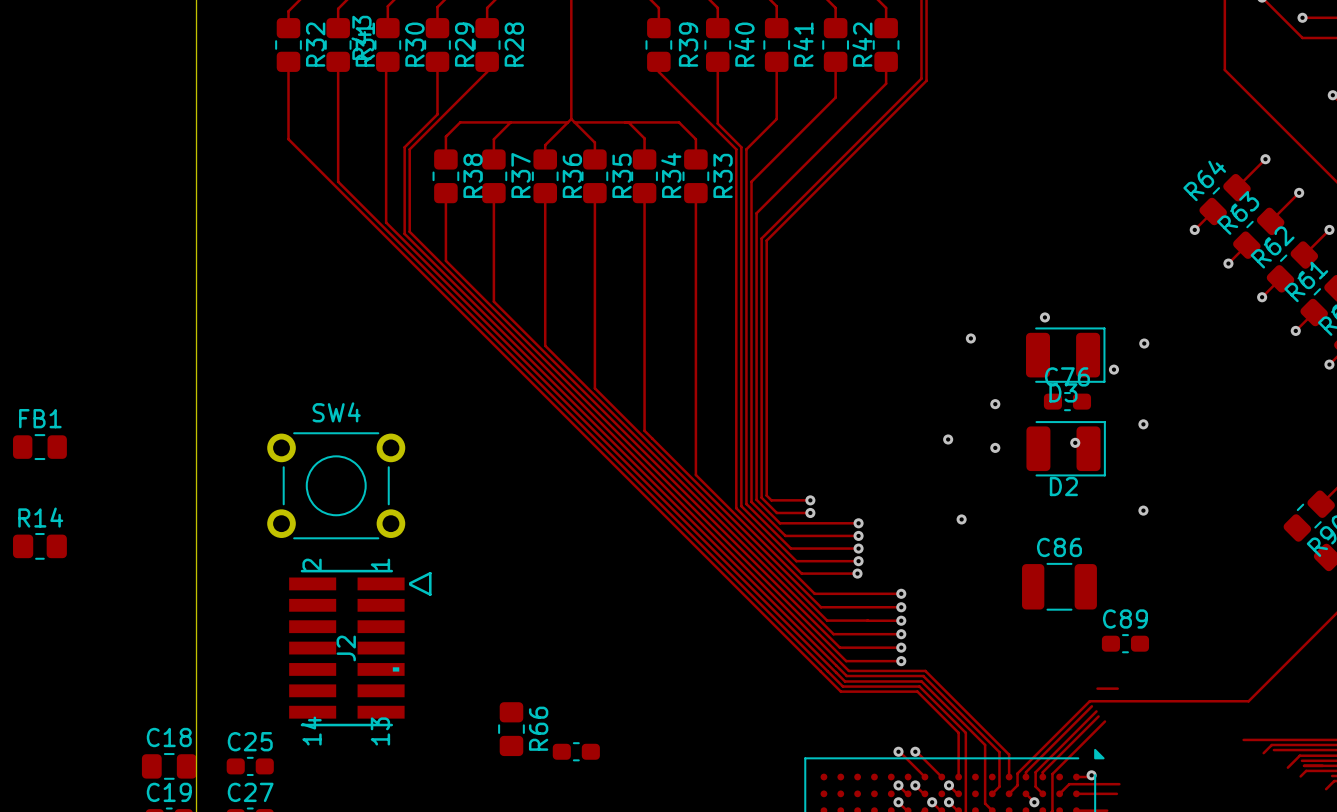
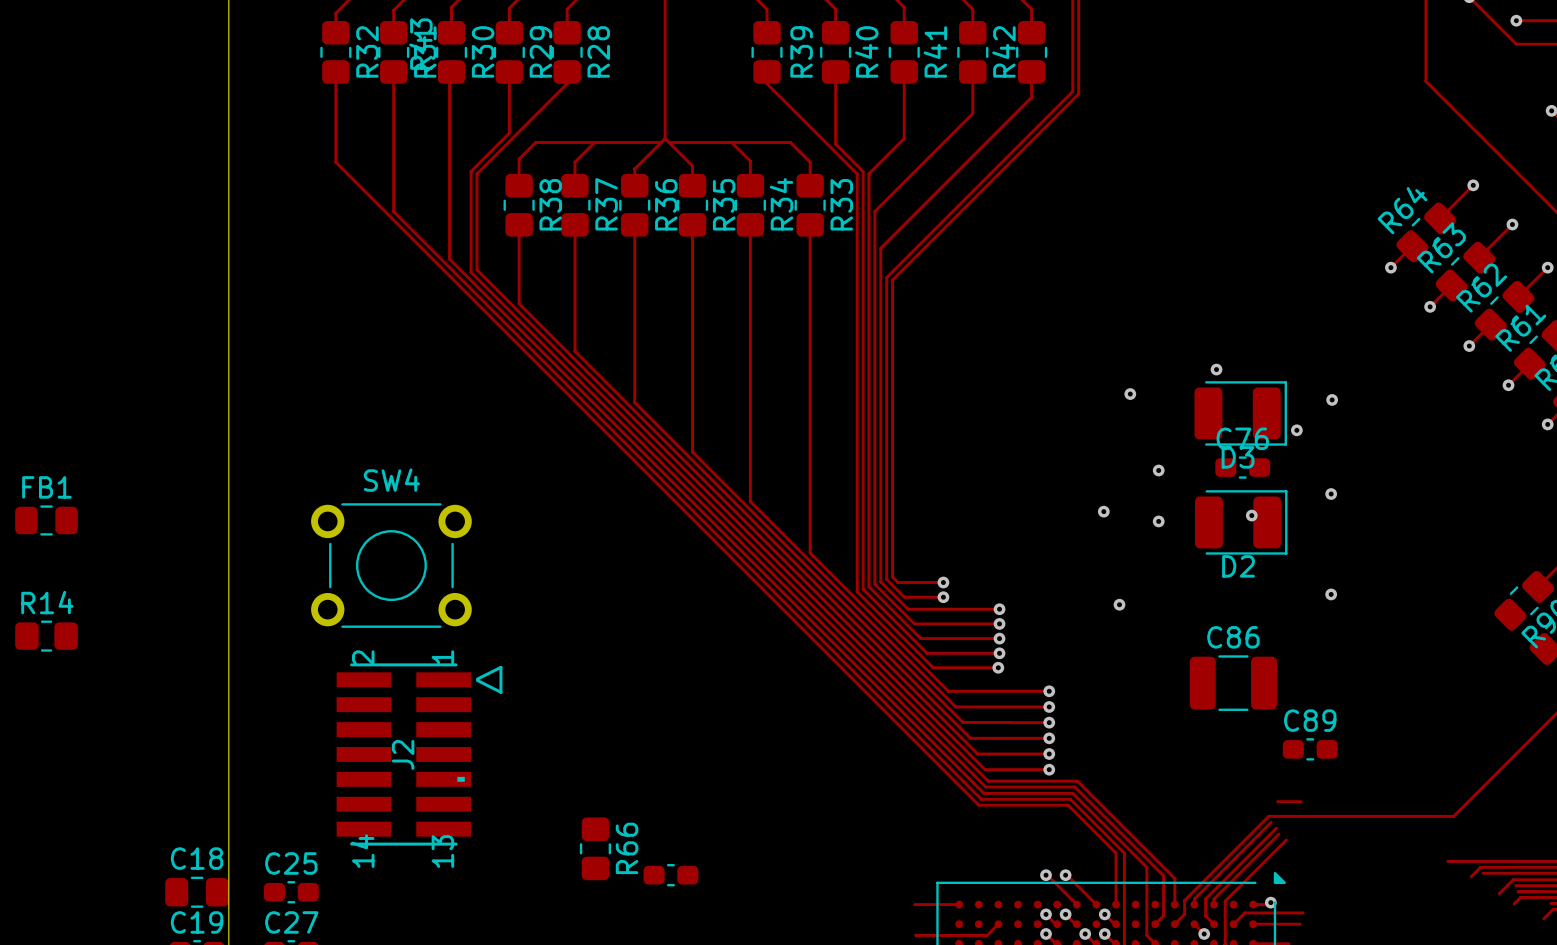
track: none -> (914, 904) (959, 904)
track: none -> (998, 924) (987, 935) (915, 934)

